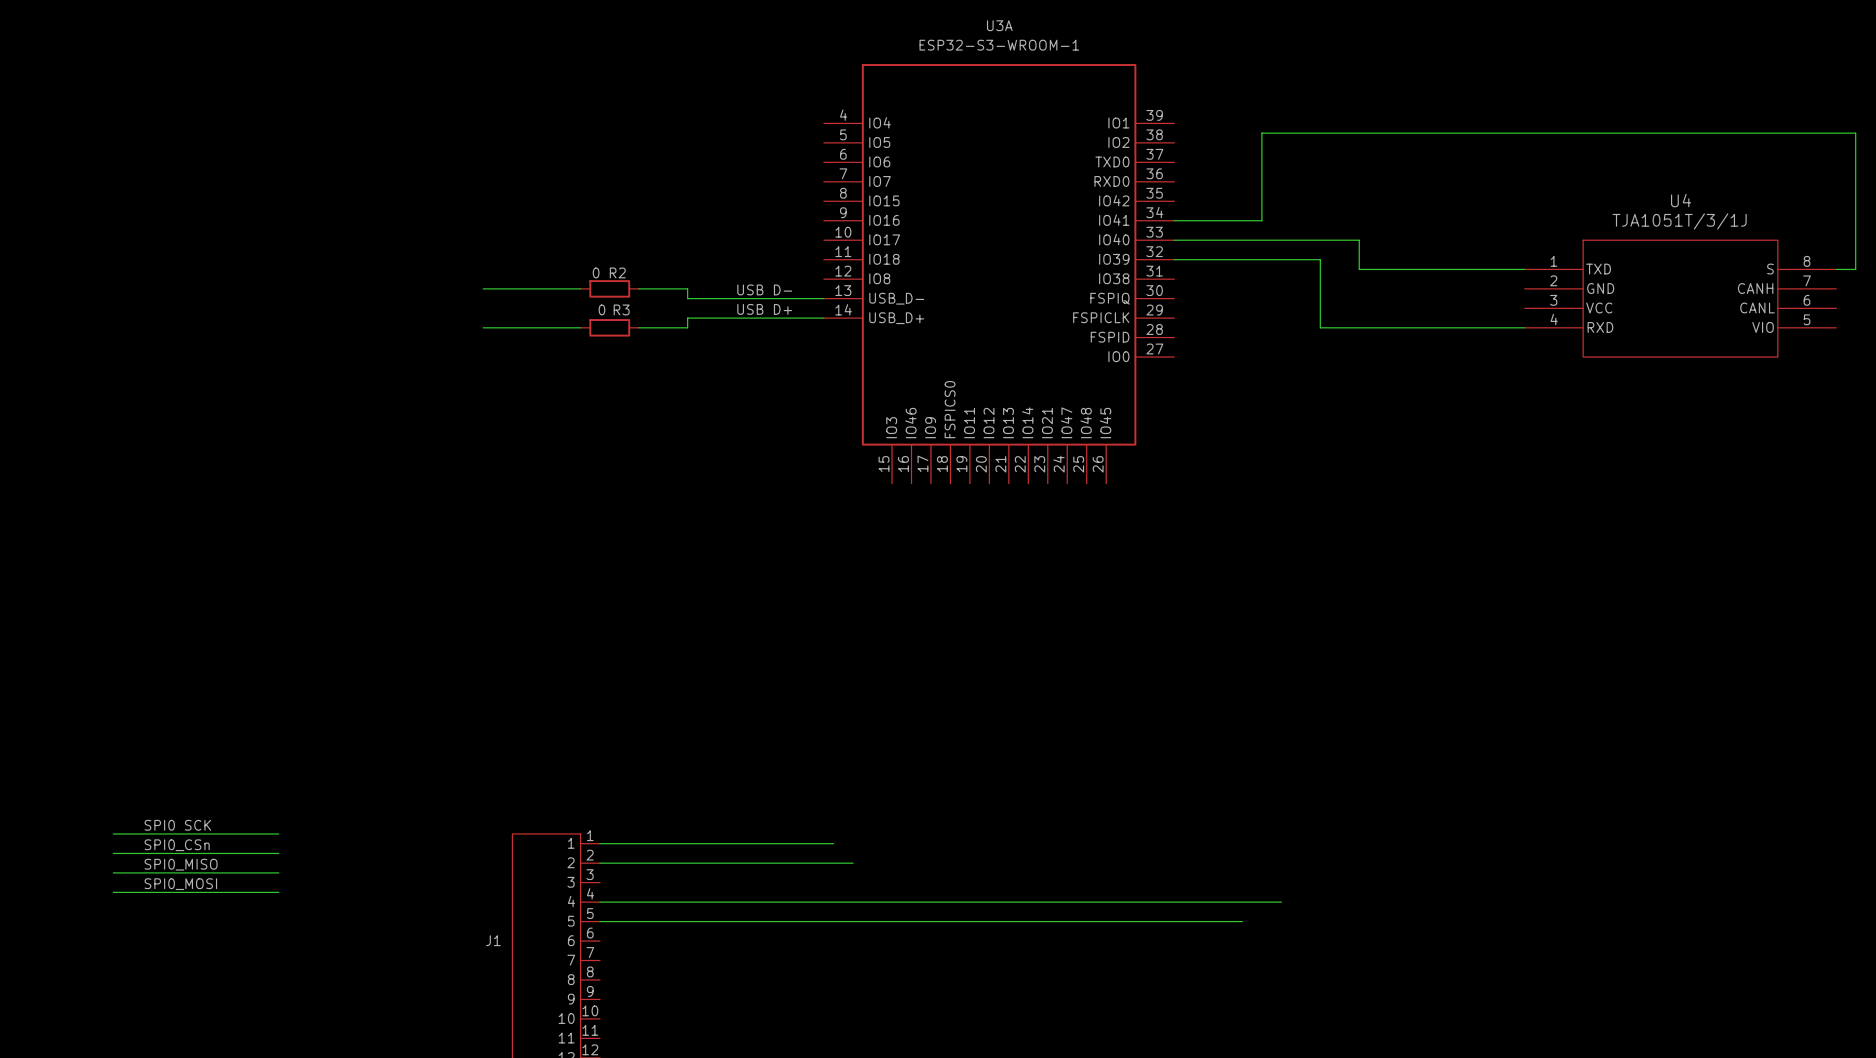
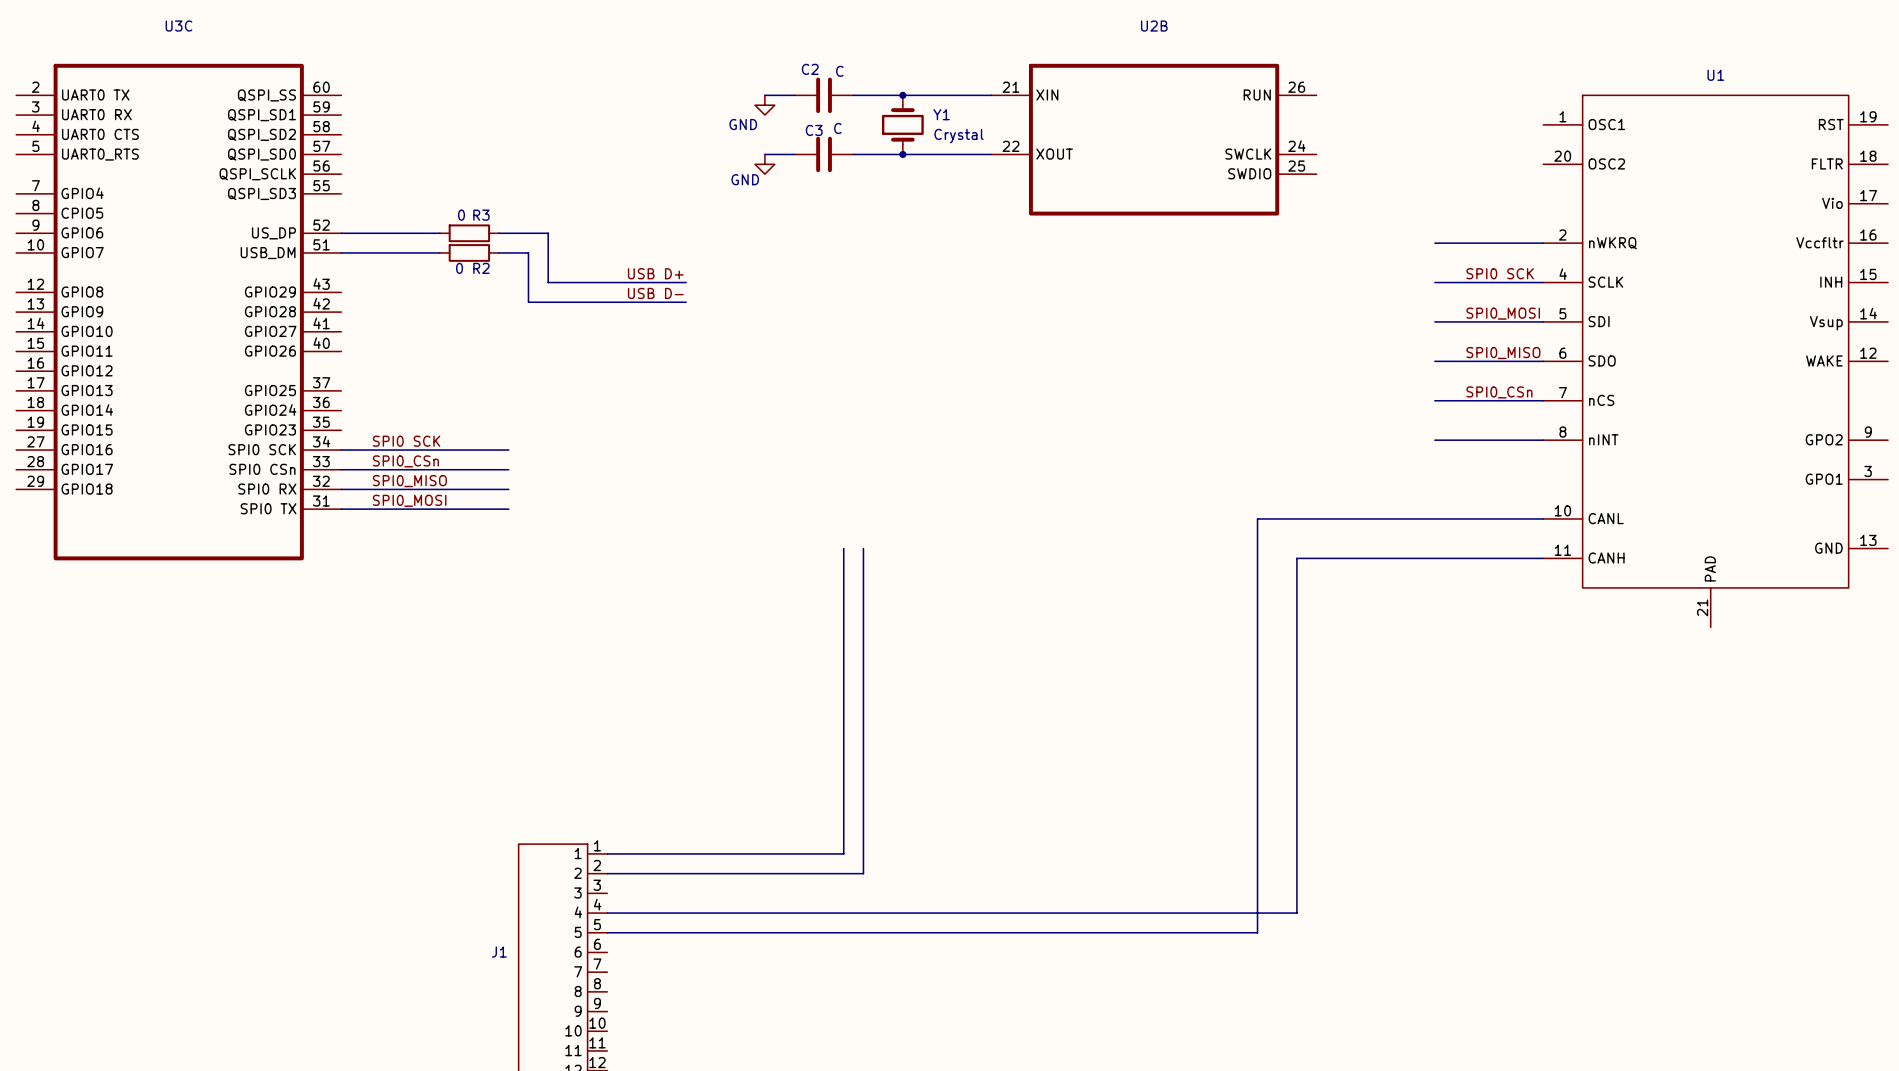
wire: none -> (764, 95) (794, 95)
C2: none -> C (824, 95)
wire: none -> (853, 95) (991, 95)
junction: none -> (902, 95)
power symbol: none -> GND (764, 105)
Y1: none -> Crystal (902, 124)
U2B: none -> (1154, 139)
wire: none -> (764, 154) (794, 154)
C3: none -> C (824, 154)
wire: none -> (853, 154) (991, 154)
junction: none -> (902, 154)
power symbol: none -> GND (764, 164)
wire: (1174, 220) (1261, 220) (1261, 133) (1855, 133) (1855, 269) (1836, 269) -> none
wire: none -> (498, 233) (548, 233) (548, 282) (686, 282)
wire: (1174, 240) (1359, 240) (1359, 269) (1524, 269) -> none
wire: none -> (1434, 243) (1543, 243)
wire: none -> (498, 252) (528, 252) (528, 302) (686, 302)
wire: (1174, 259) (1320, 259) (1320, 327) (1524, 327) -> none
label: none -> SPI0 SCK (1500, 273)
R2 value position: 0 (596, 272) -> 0 (459, 268)
R2 name position: R2 (617, 272) -> R2 (481, 268)
U3A: ESP32-S3-WROOM-1 (999, 273) -> none
wire: none -> (1434, 282) (1543, 282)
wire: (483, 288) (580, 288) -> (341, 252) (439, 252)
R2 position: (609, 288) -> (469, 252)
wire: (638, 288) (687, 288) (687, 298) (823, 298) -> none
label position: USB D- (764, 289) -> USB D- (655, 293)
U4: TJA1051T/3/1J (1680, 298) -> none
U3C: none -> (178, 312)
label position: USB D+ (764, 309) -> USB D+ (655, 273)
label: none -> SPI0_MOSI (1503, 313)
wire: (823, 318) (687, 318) (687, 327) (638, 327) -> none
wire: none -> (1434, 321) (1543, 321)
wire: (483, 327) (580, 327) -> (341, 233) (439, 233)
R3 position: (609, 327) -> (469, 233)
label: none -> SPI0_MISO (1503, 353)
wire: none -> (1434, 361) (1543, 361)
U1: none -> (1715, 361)
label: none -> SPI0_CSn (1499, 392)
wire: none -> (1434, 400) (1543, 400)
wire: none -> (1434, 440) (1543, 440)
label: none -> SPI0 SCK (406, 441)
wire: none -> (341, 450) (508, 450)
label: none -> SPI0_CSn (405, 461)
wire: none -> (341, 469) (508, 469)
label: none -> SPI0_MISO (409, 481)
wire: none -> (341, 489) (508, 489)
label: none -> SPI0_MOSI (409, 500)
wire: none -> (341, 509) (508, 509)
wire: none -> (1543, 518) (1257, 518) (1257, 932)
wire: none -> (843, 548) (843, 853)
wire: none -> (863, 548) (863, 873)
wire: none -> (1543, 558) (1296, 558) (1296, 913)
label: SPI0 SCK (177, 825) -> none
wire: (113, 833) (278, 833) -> none
label: SPI0_CSn (177, 845) -> none
wire: (113, 853) (278, 853) -> none
label: SPI0_MISO (181, 864) -> none
wire: (113, 872) (278, 872) -> none
label: SPI0_MOSI (180, 884) -> none
wire: (113, 892) (278, 892) -> none

